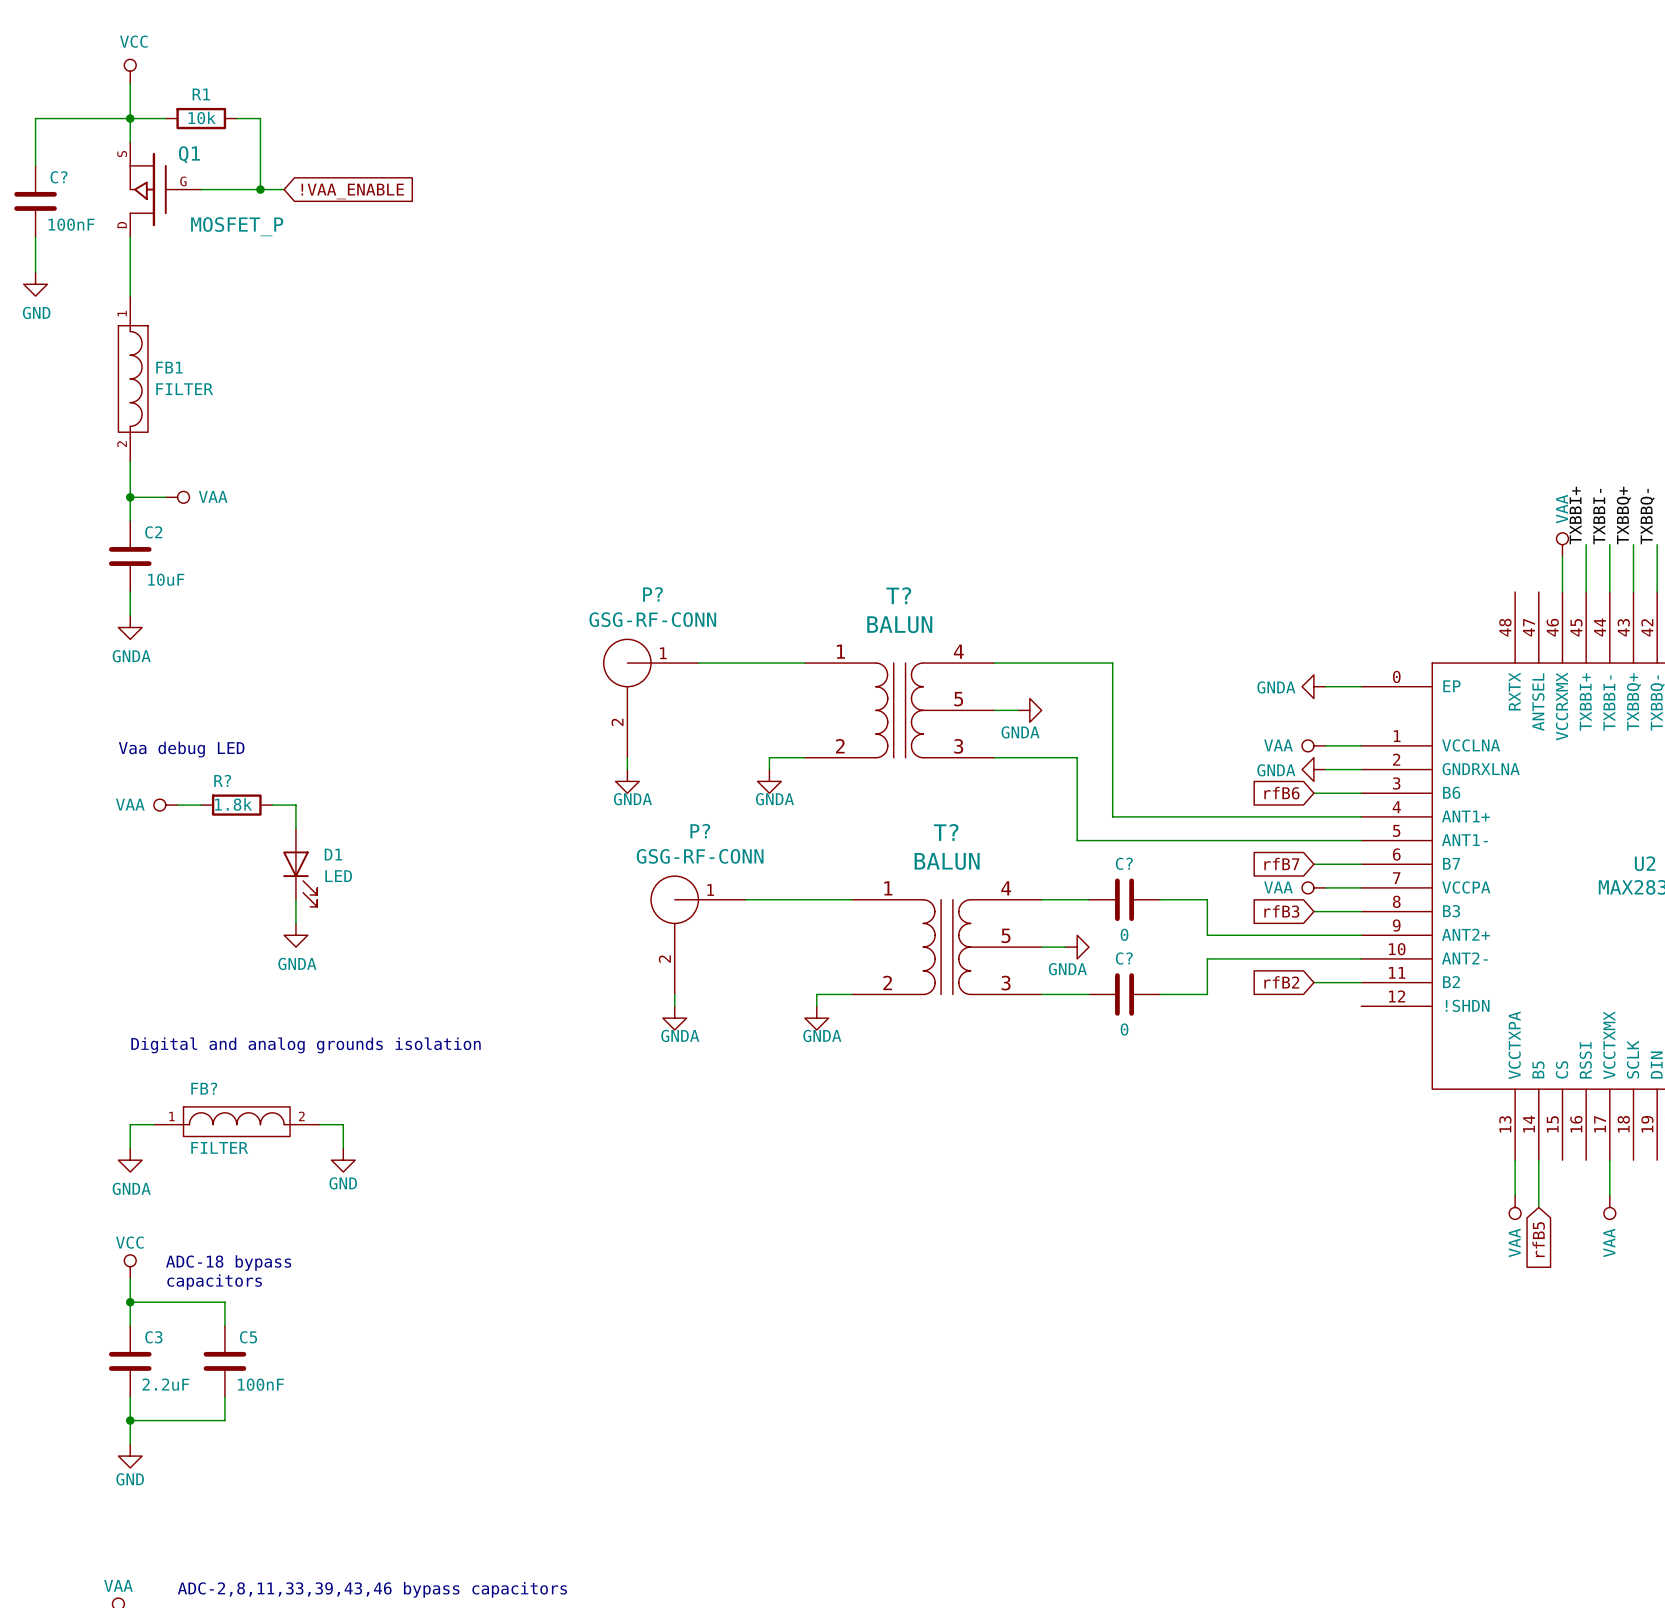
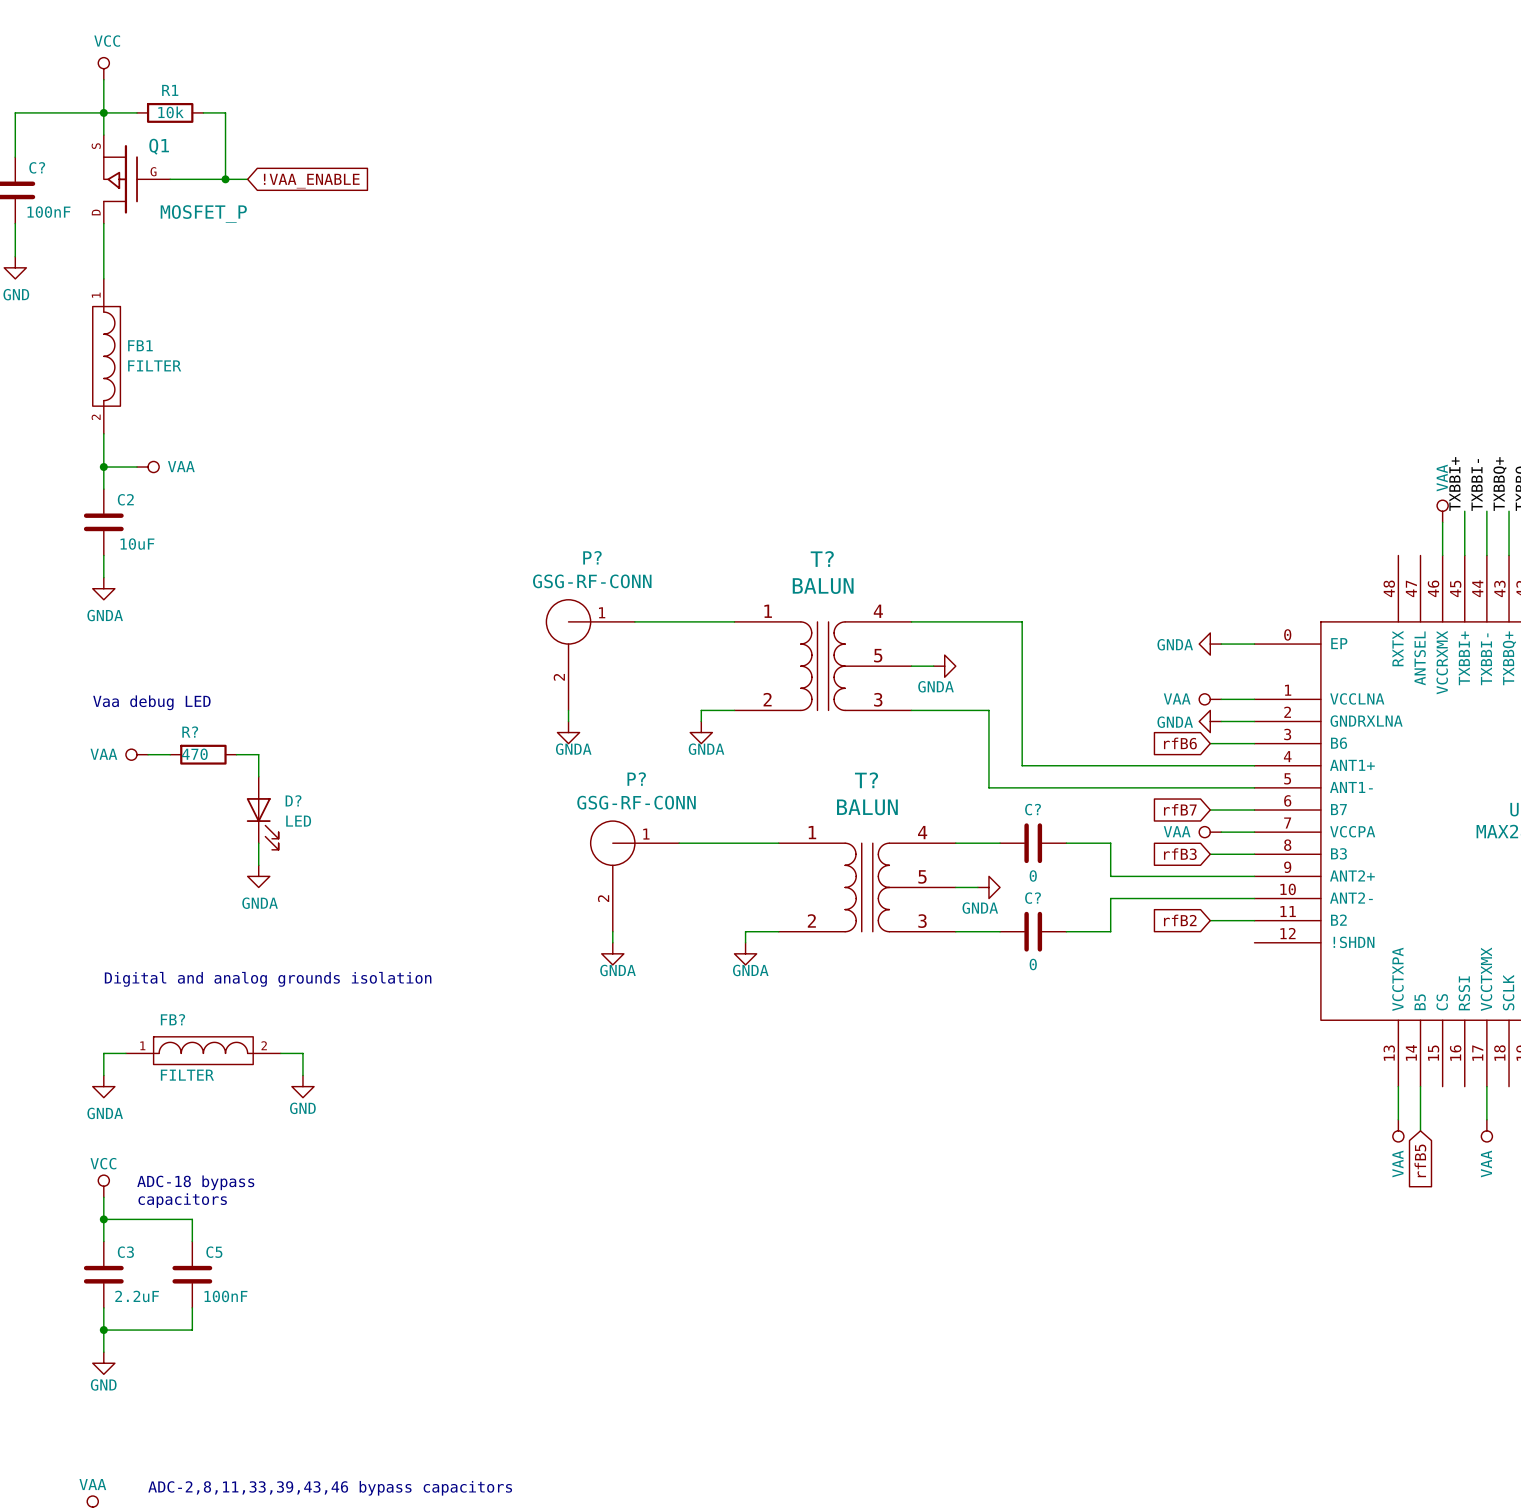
R? value: 1.8k (233, 804) -> 470 (194, 754)
D1 name: D1 (333, 854) -> D? (293, 800)

